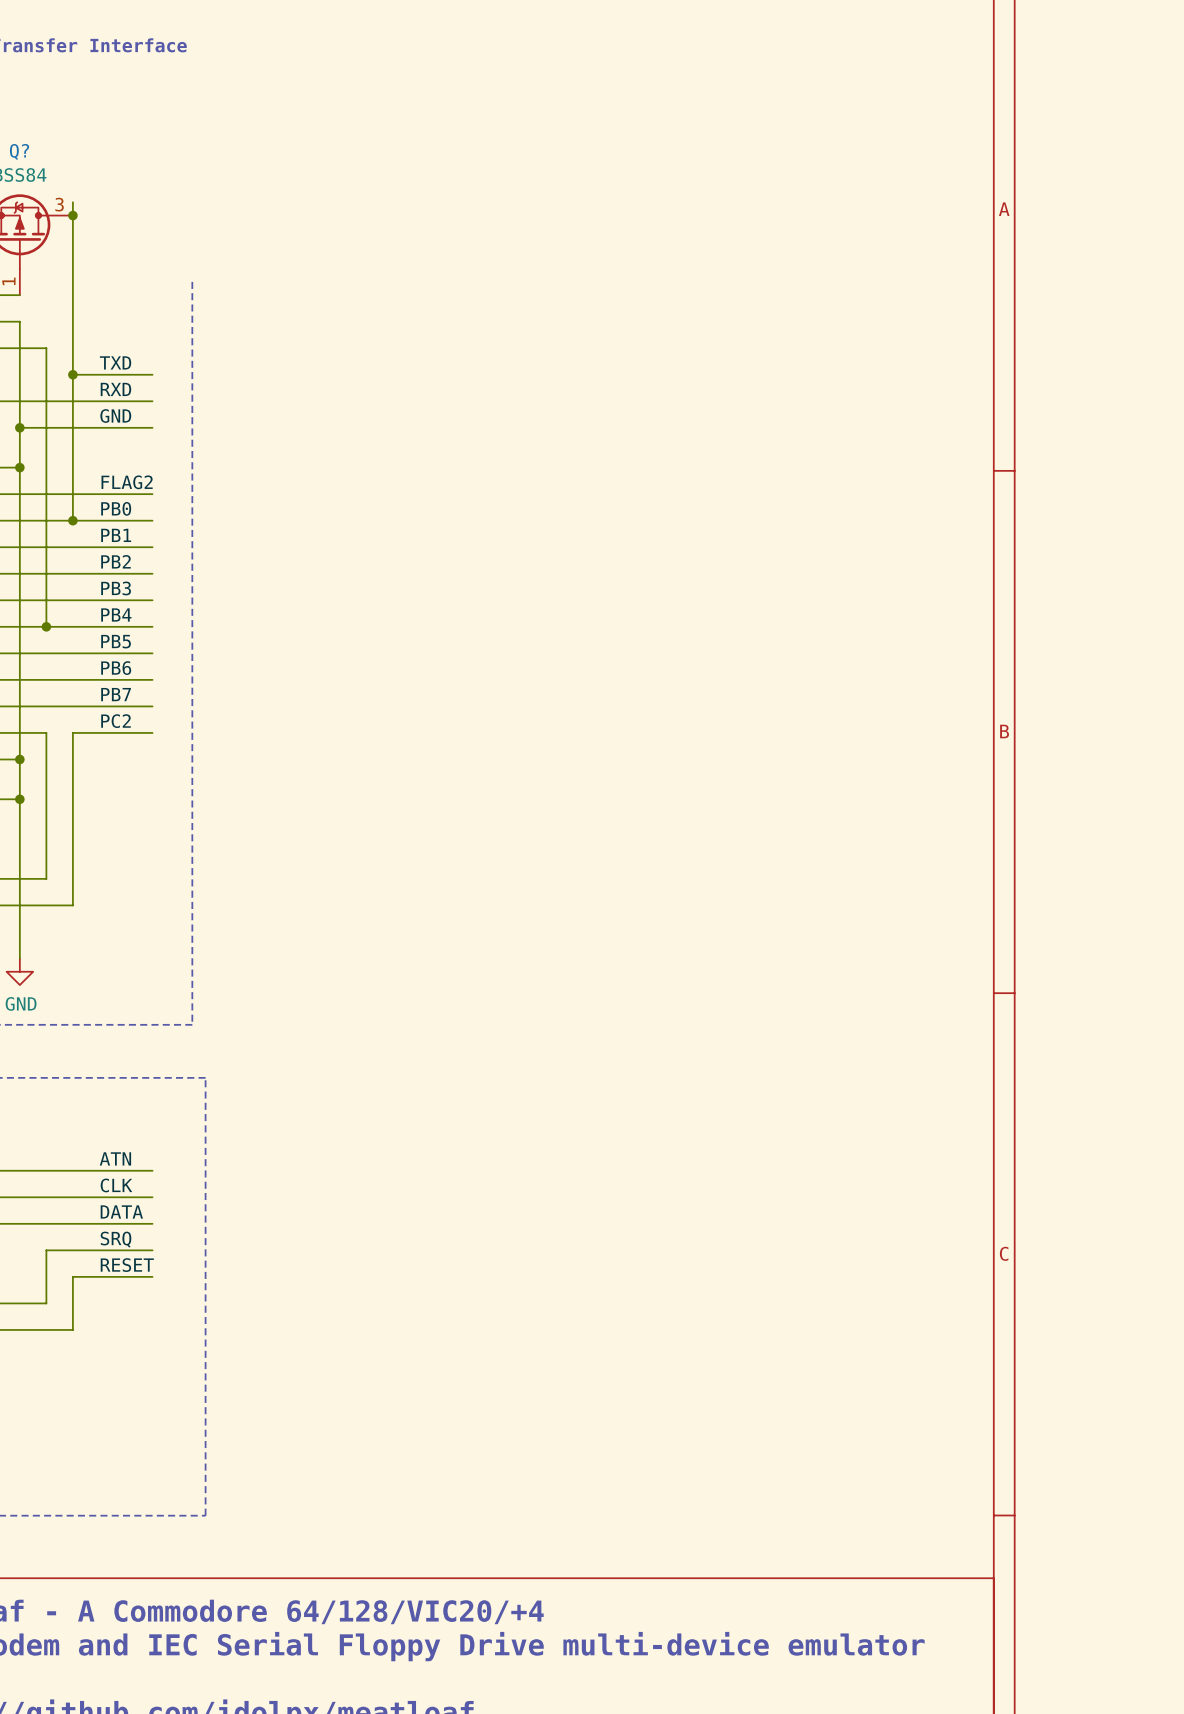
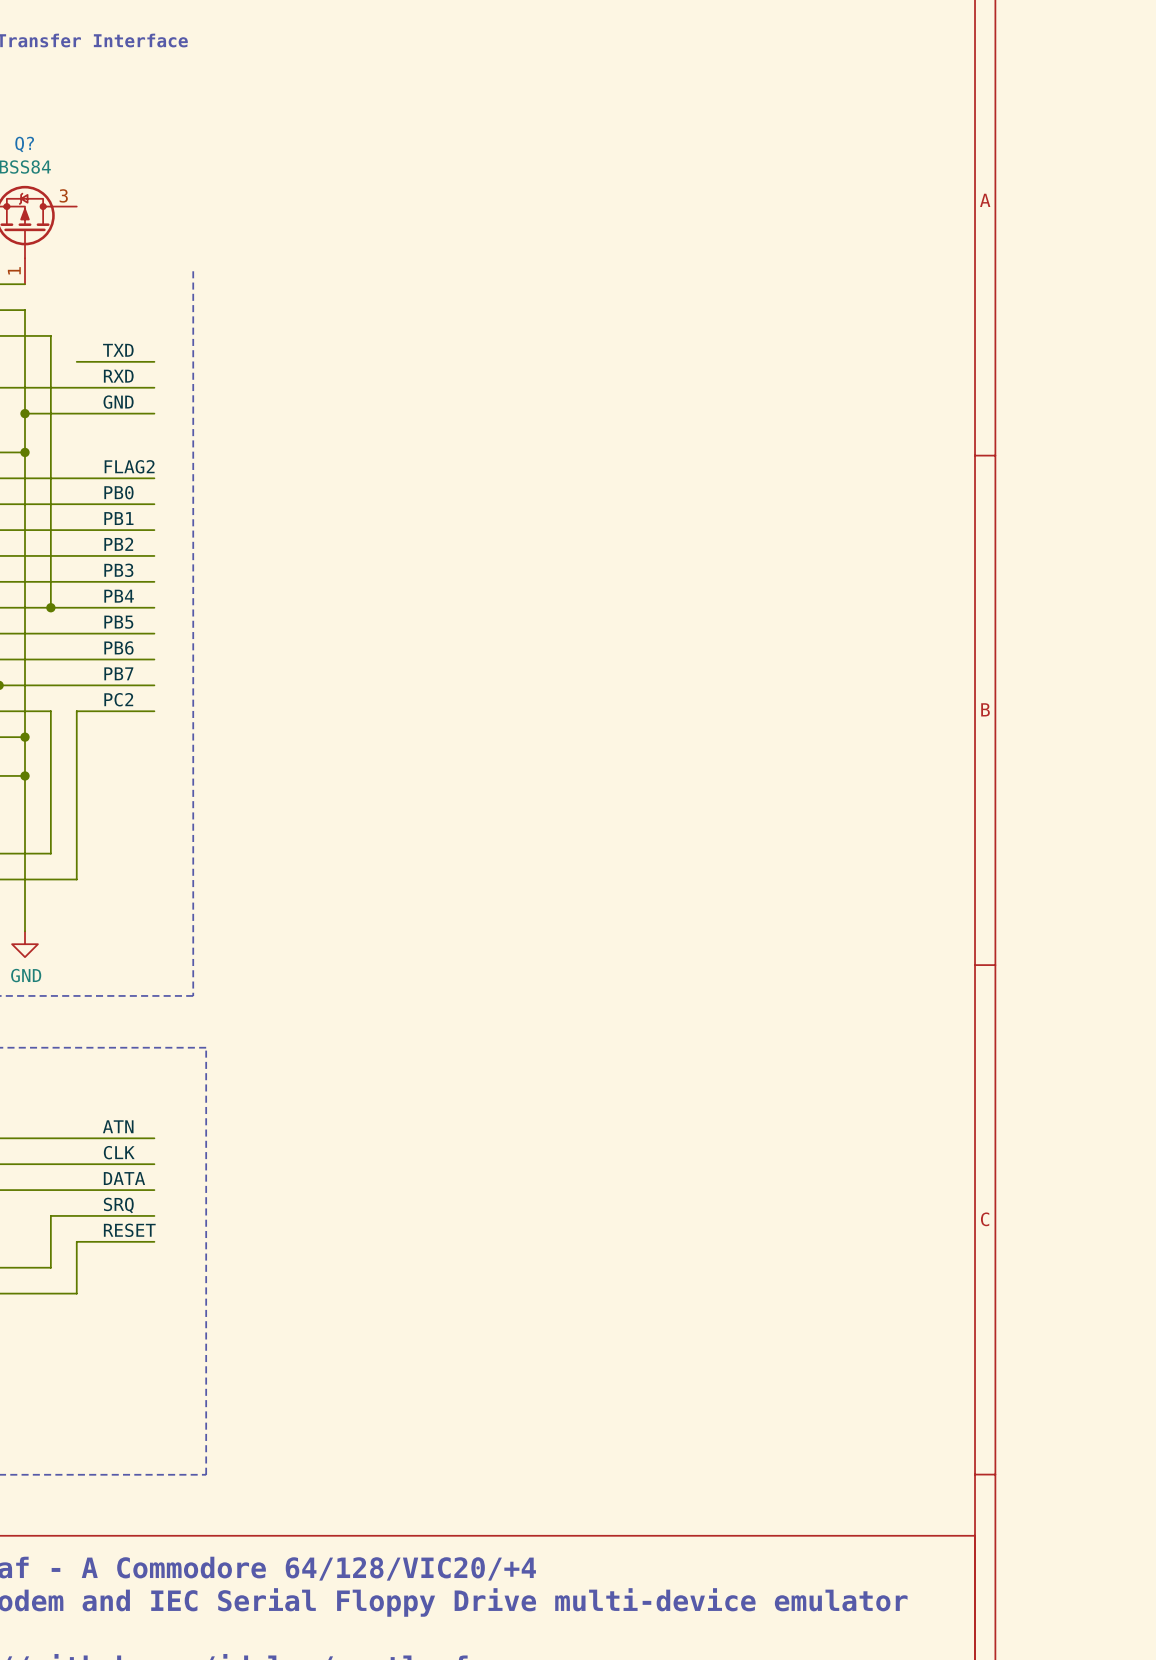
wire: (72, 202) (72, 520) -> none
junction: (72, 215) -> none
junction: (72, 374) -> none
junction: (72, 520) -> none

